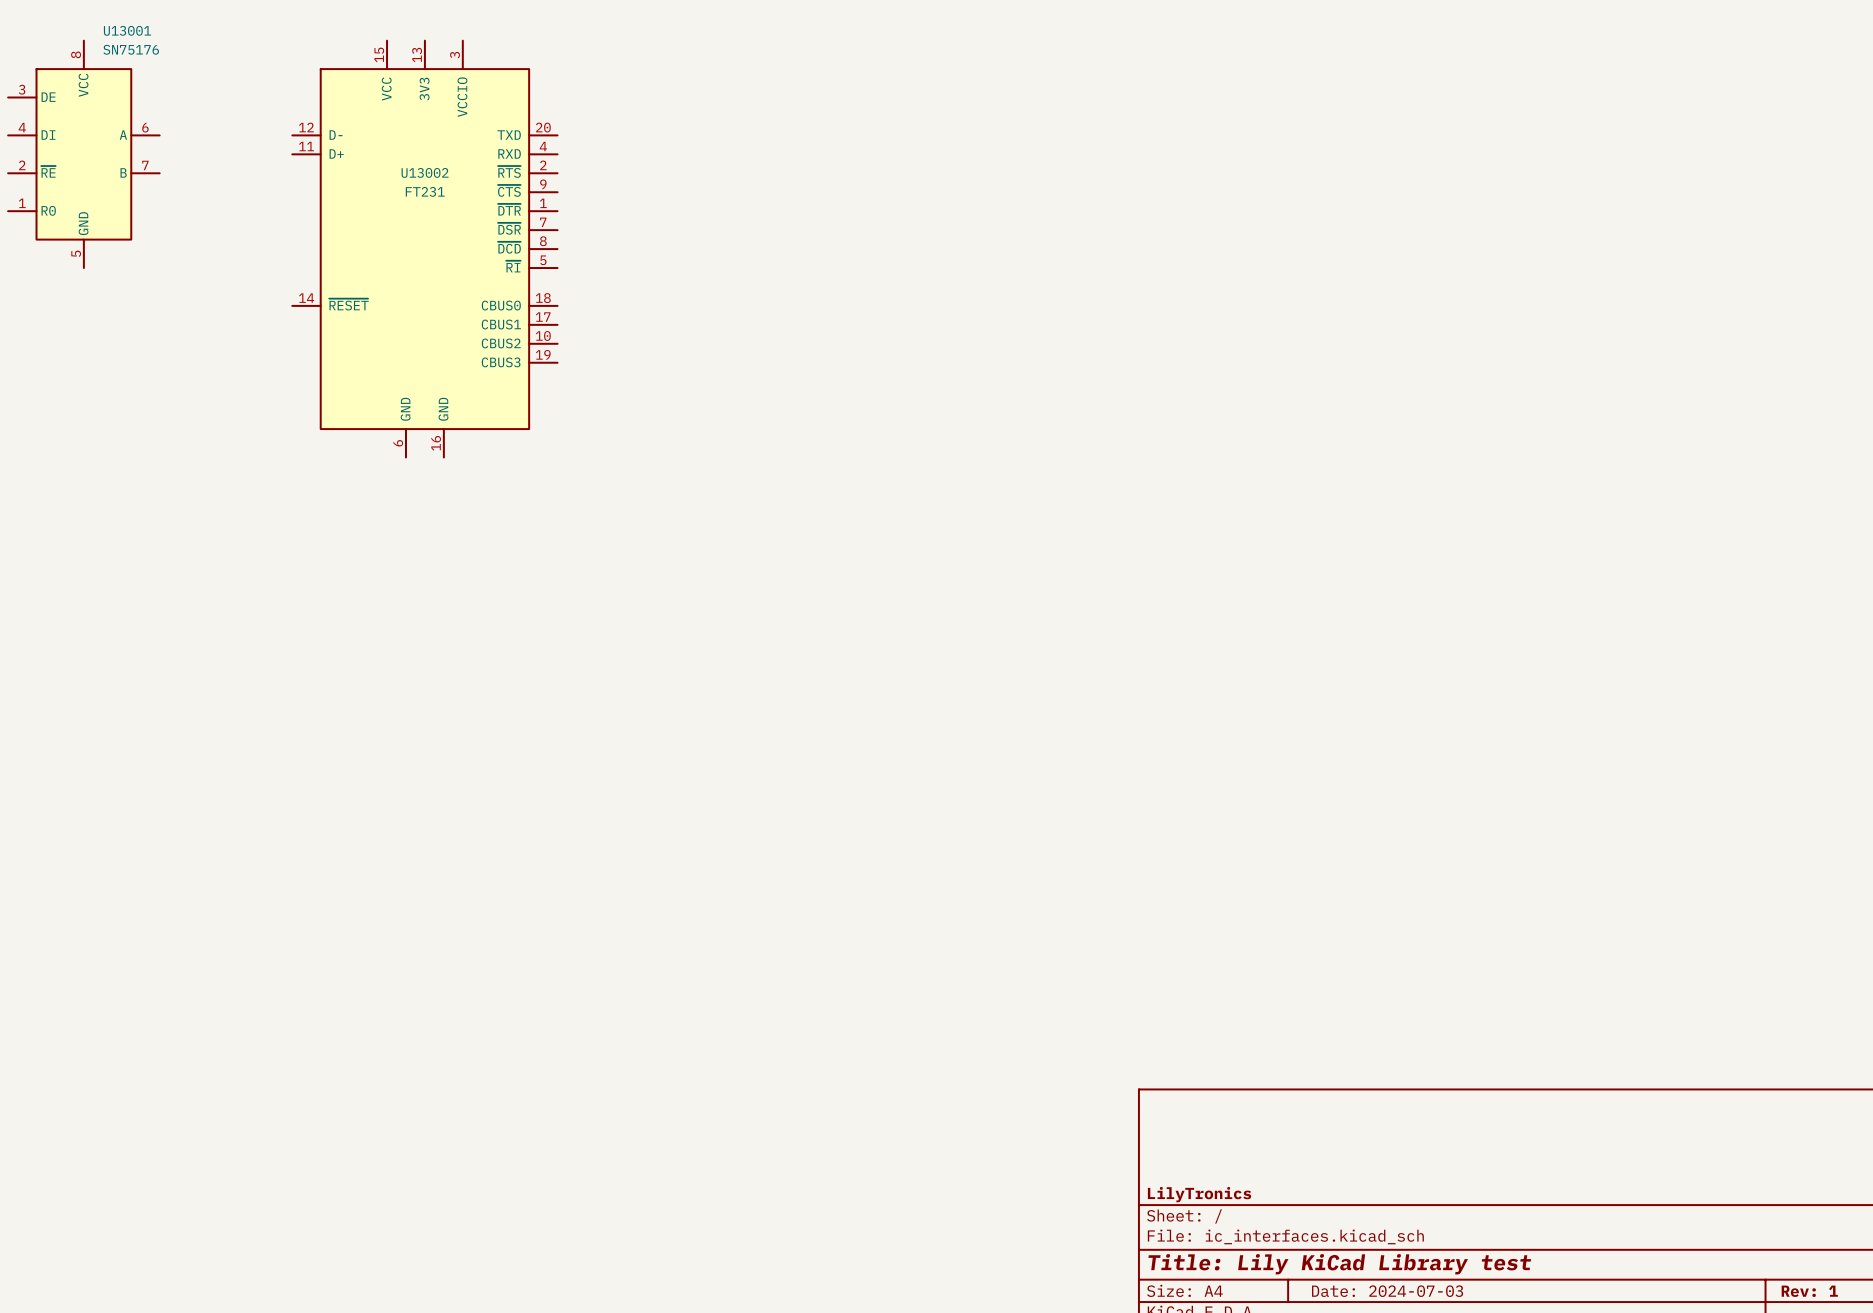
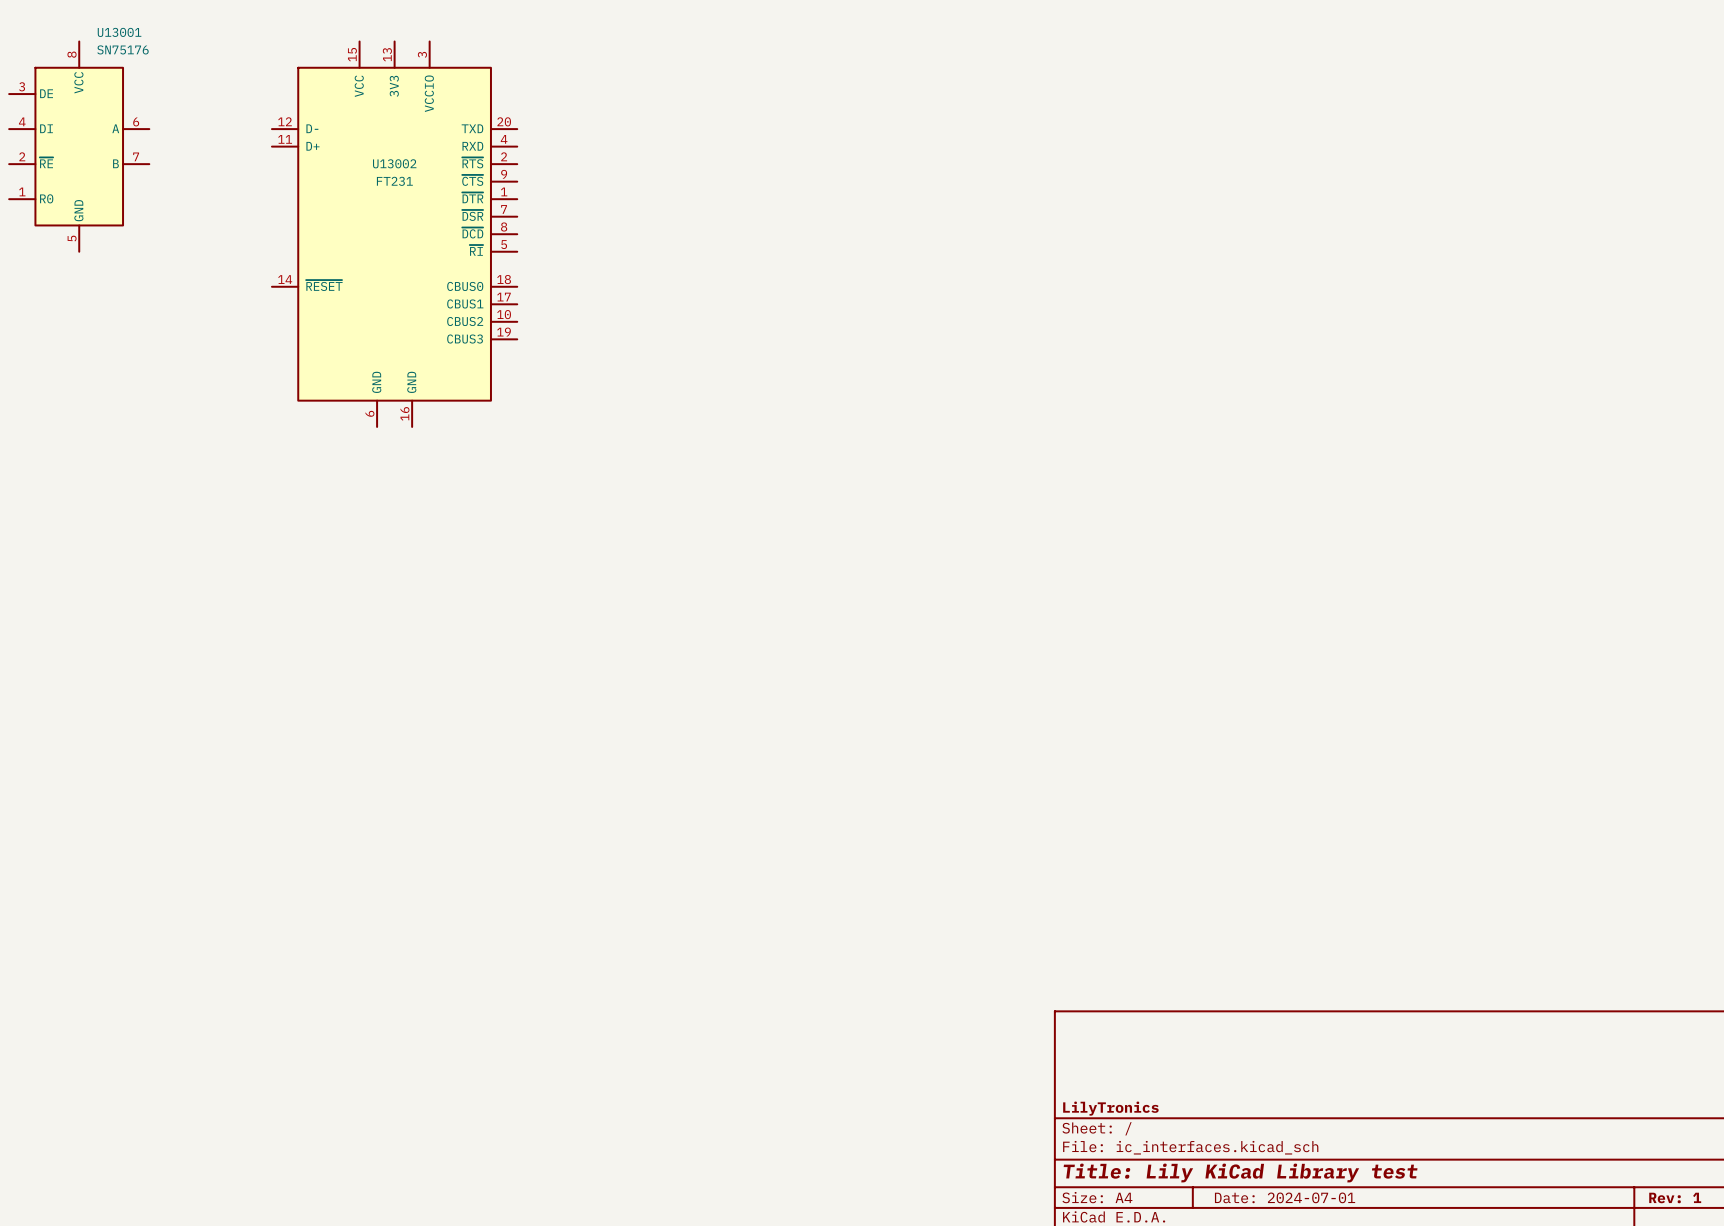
title block: Date: 2024-07-03 (1387, 1291) -> Date: 2024-07-01 (1285, 1197)

